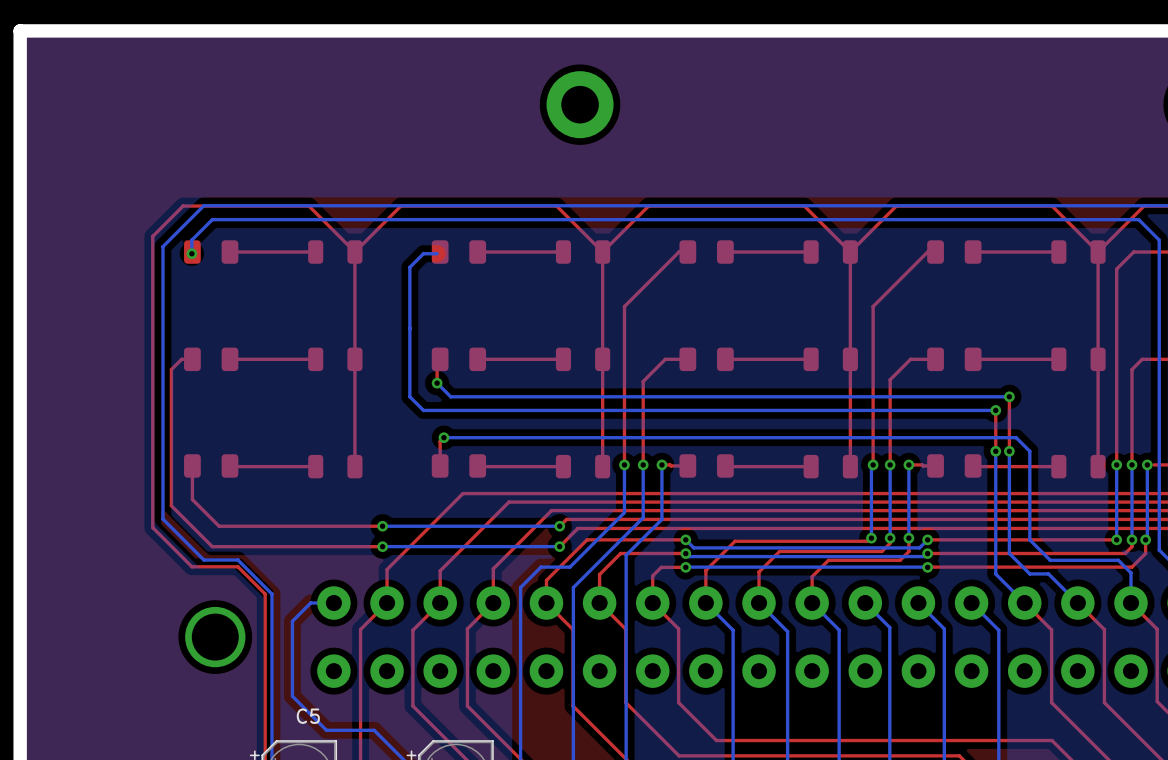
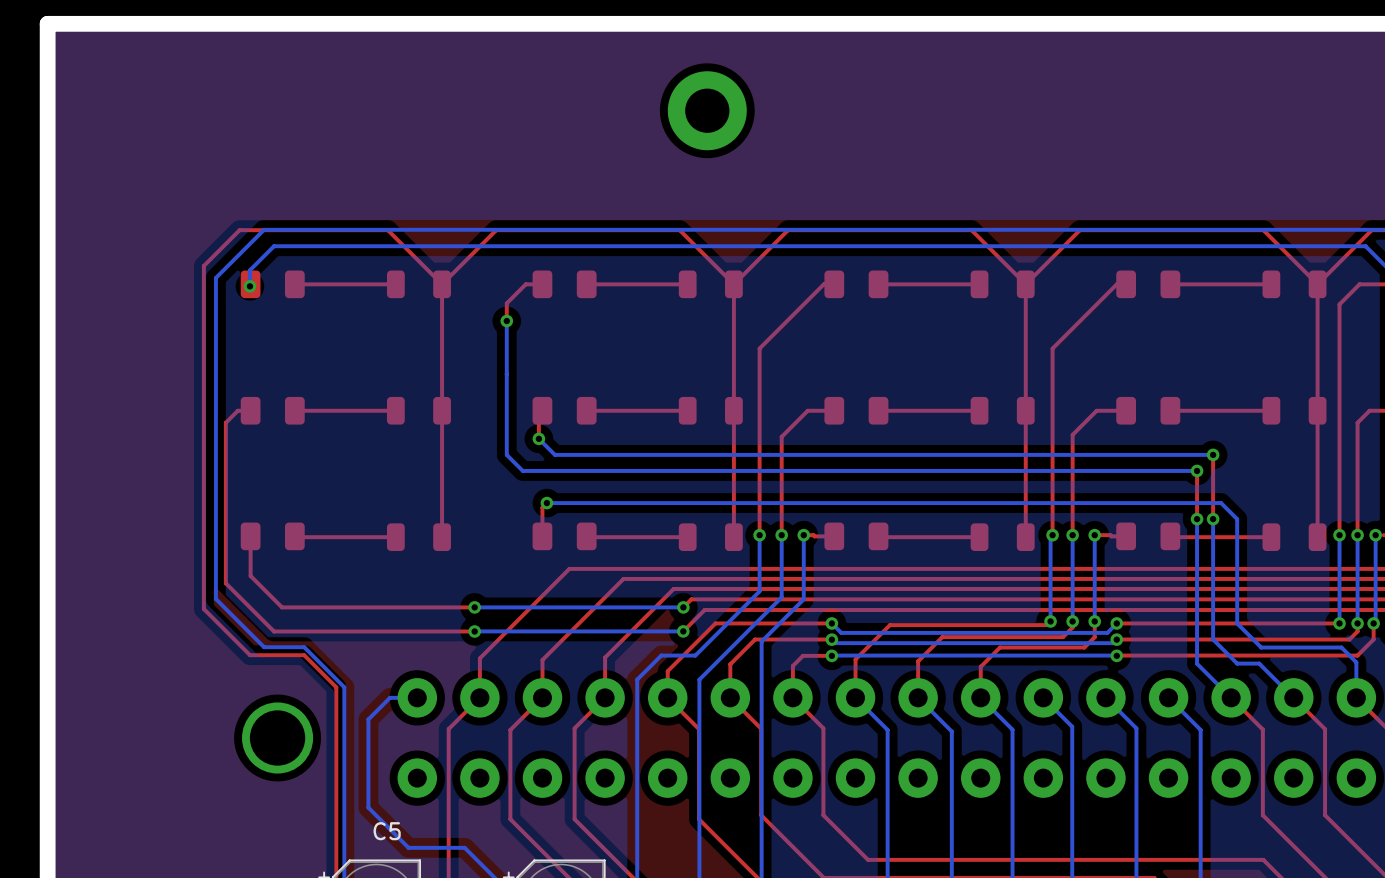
top track: none -> (542, 284) (525, 284) (506, 303) (506, 321)
bottom track: (437, 253) (423, 253) (409, 267) (409, 283) -> none
via: none -> (506, 321)

